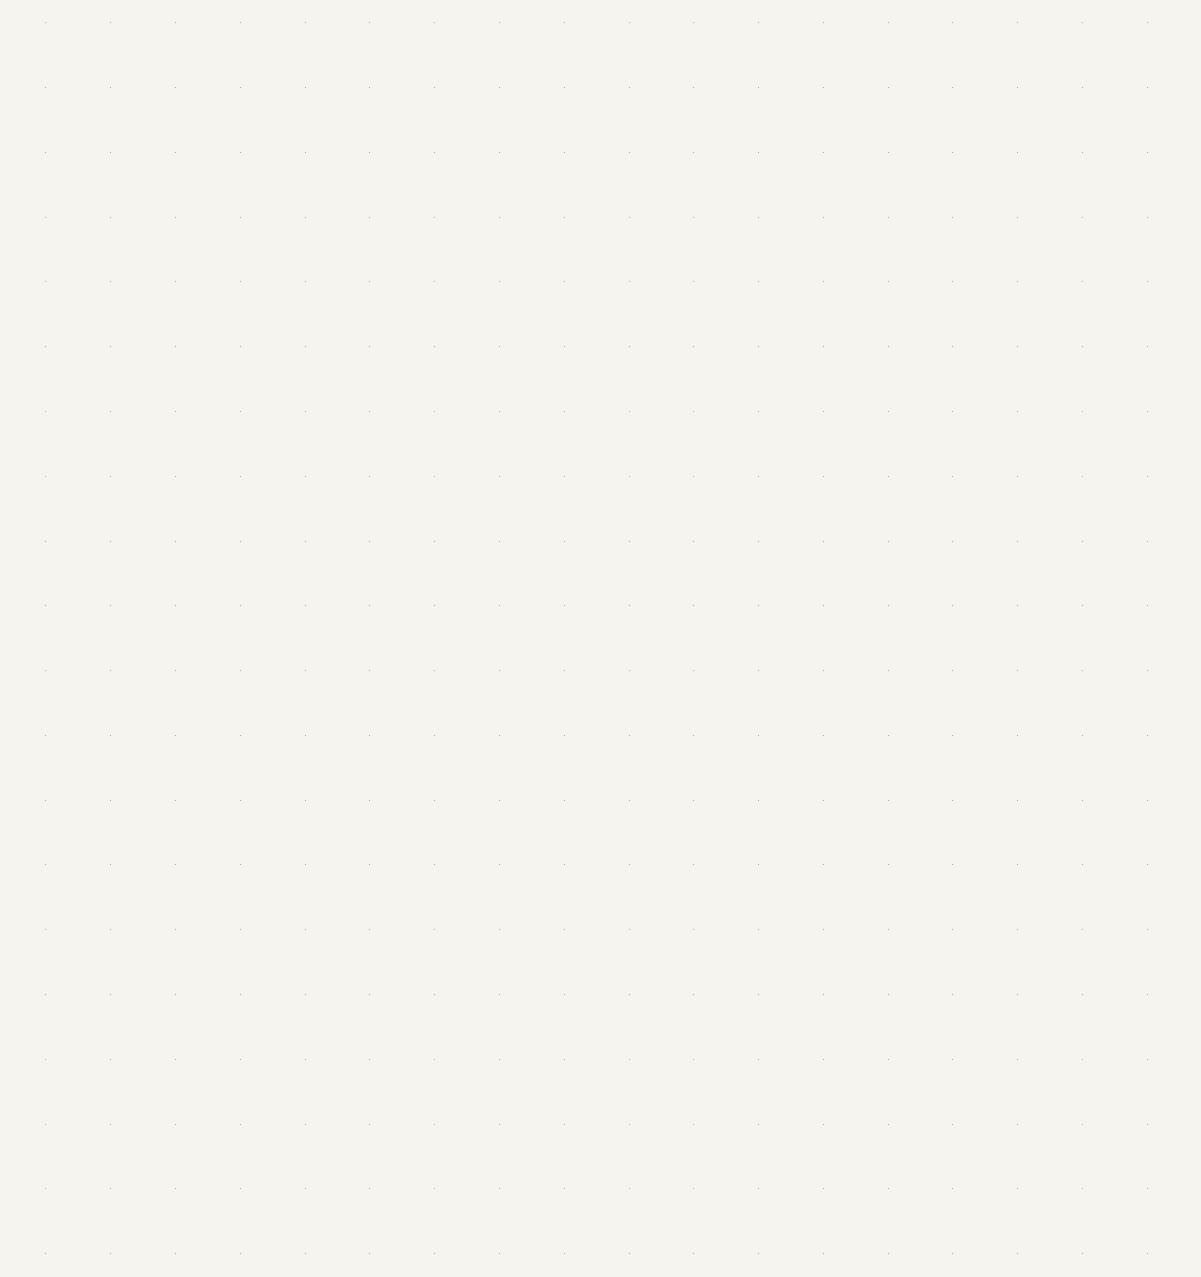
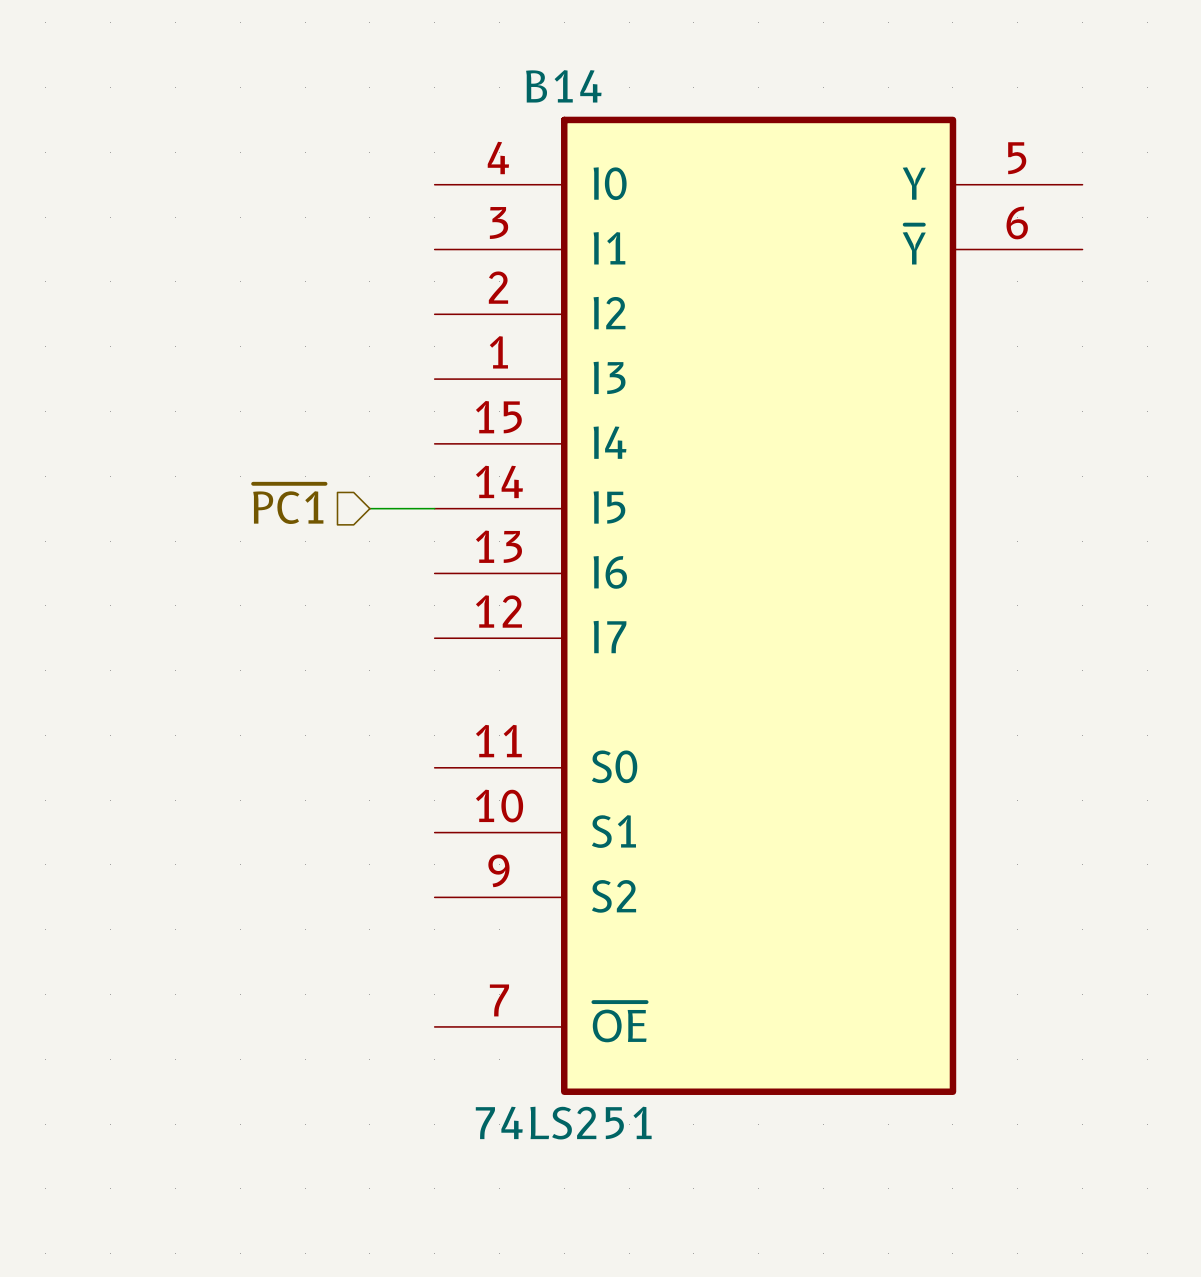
hierarchical label: none -> ~{PC1} (289, 503)
wire: none -> (369, 508) (434, 508)
B14: none -> 74LS251 (758, 605)

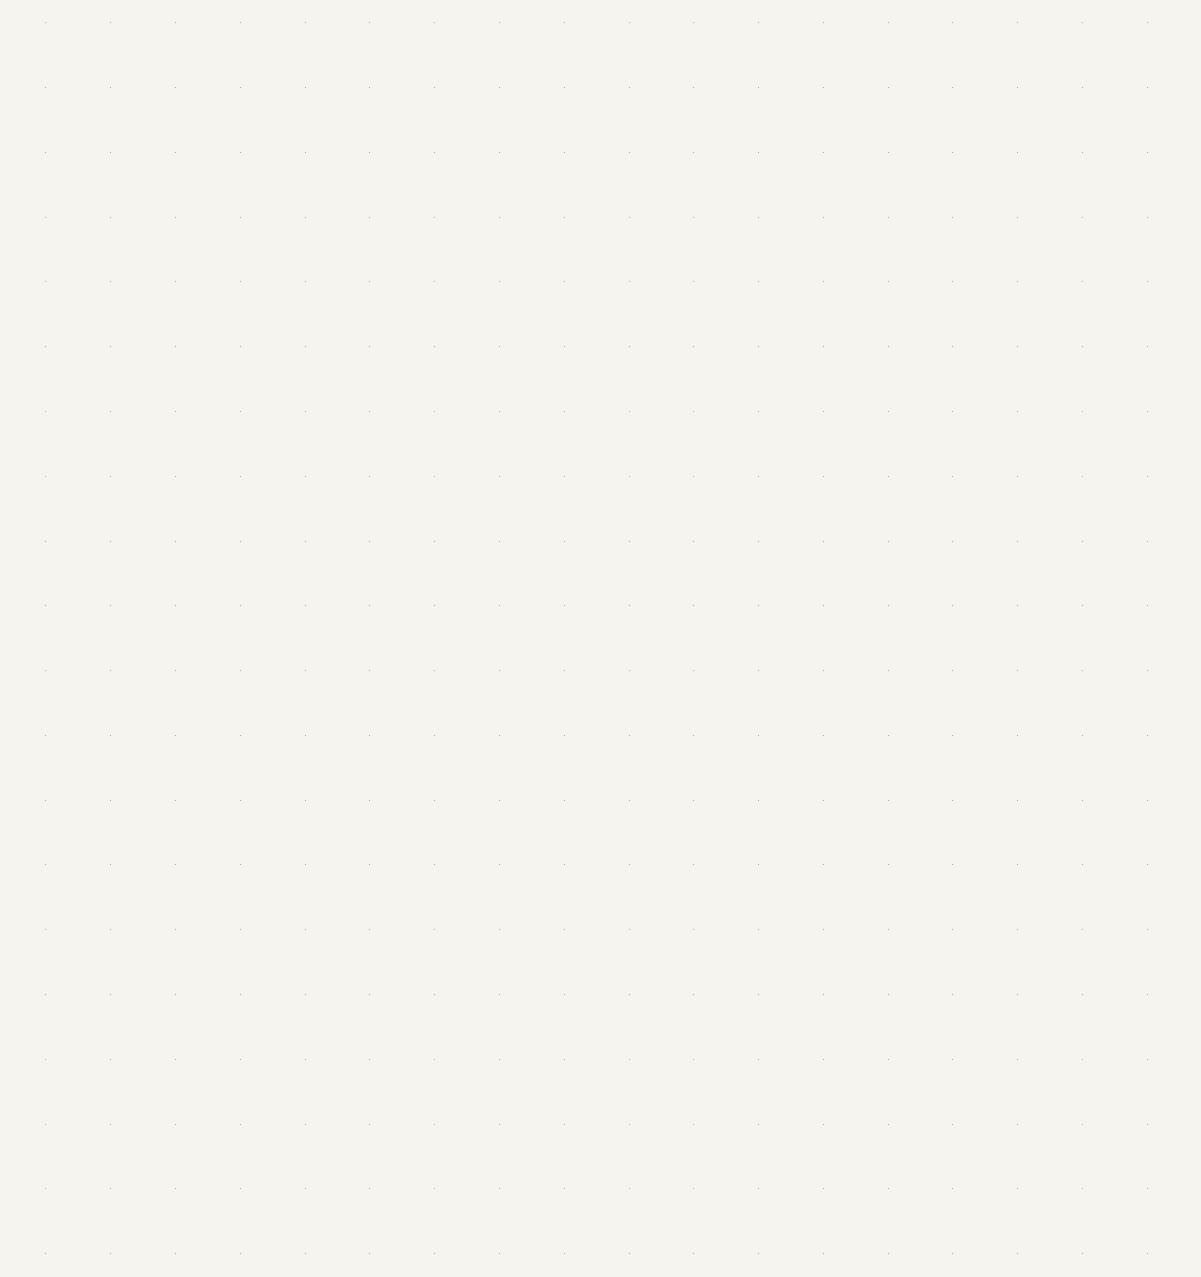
hierarchical label: ~{PC1} (289, 503) -> none
wire: (369, 508) (434, 508) -> none
B14: 74LS251 (758, 605) -> none

